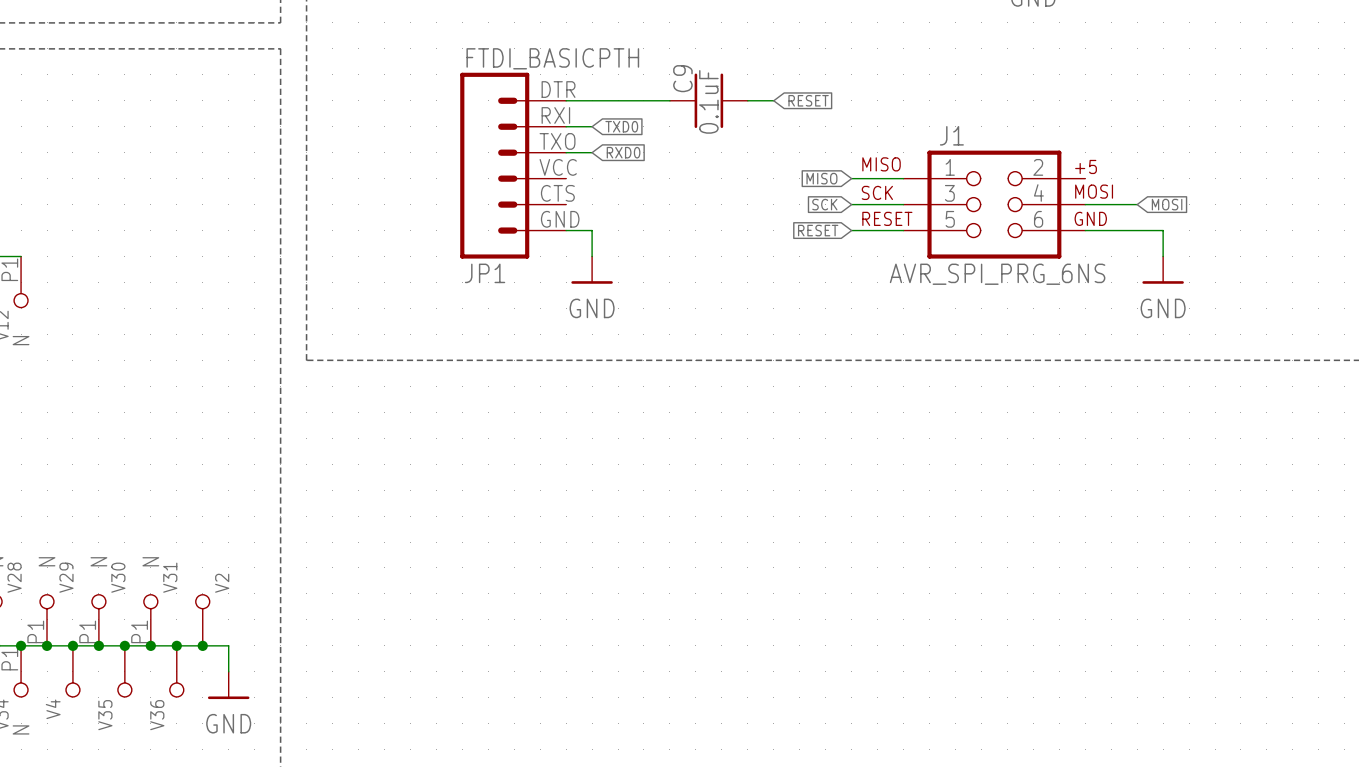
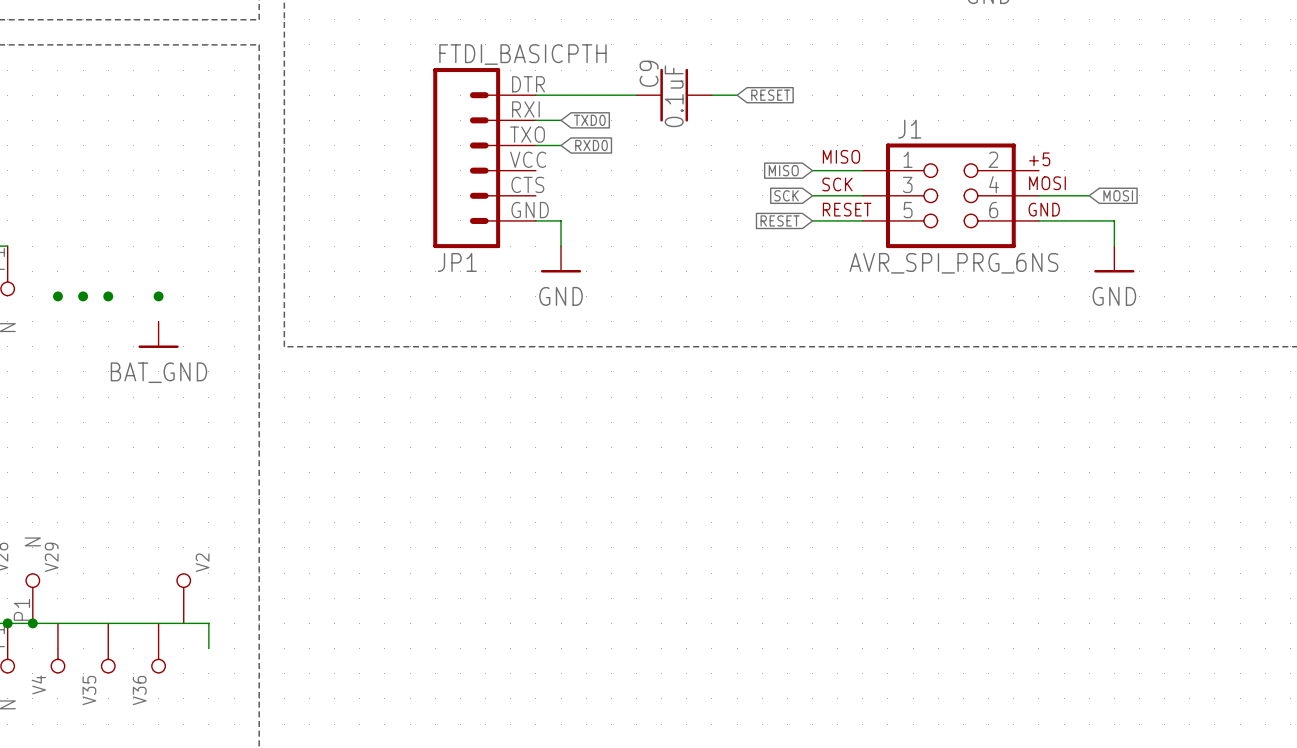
junction: none -> (57, 296)
junction: none -> (83, 296)
junction: none -> (108, 296)
junction: none -> (158, 296)
power symbol: none -> BAT_GND (158, 334)
V30: (98, 620) -> none
V31: (150, 620) -> none
junction: (72, 645) -> none
junction: (98, 645) -> none
junction: (124, 645) -> none
junction: (150, 645) -> none
junction: (176, 645) -> none
junction: (202, 645) -> none
power symbol: GND (228, 685) -> none

